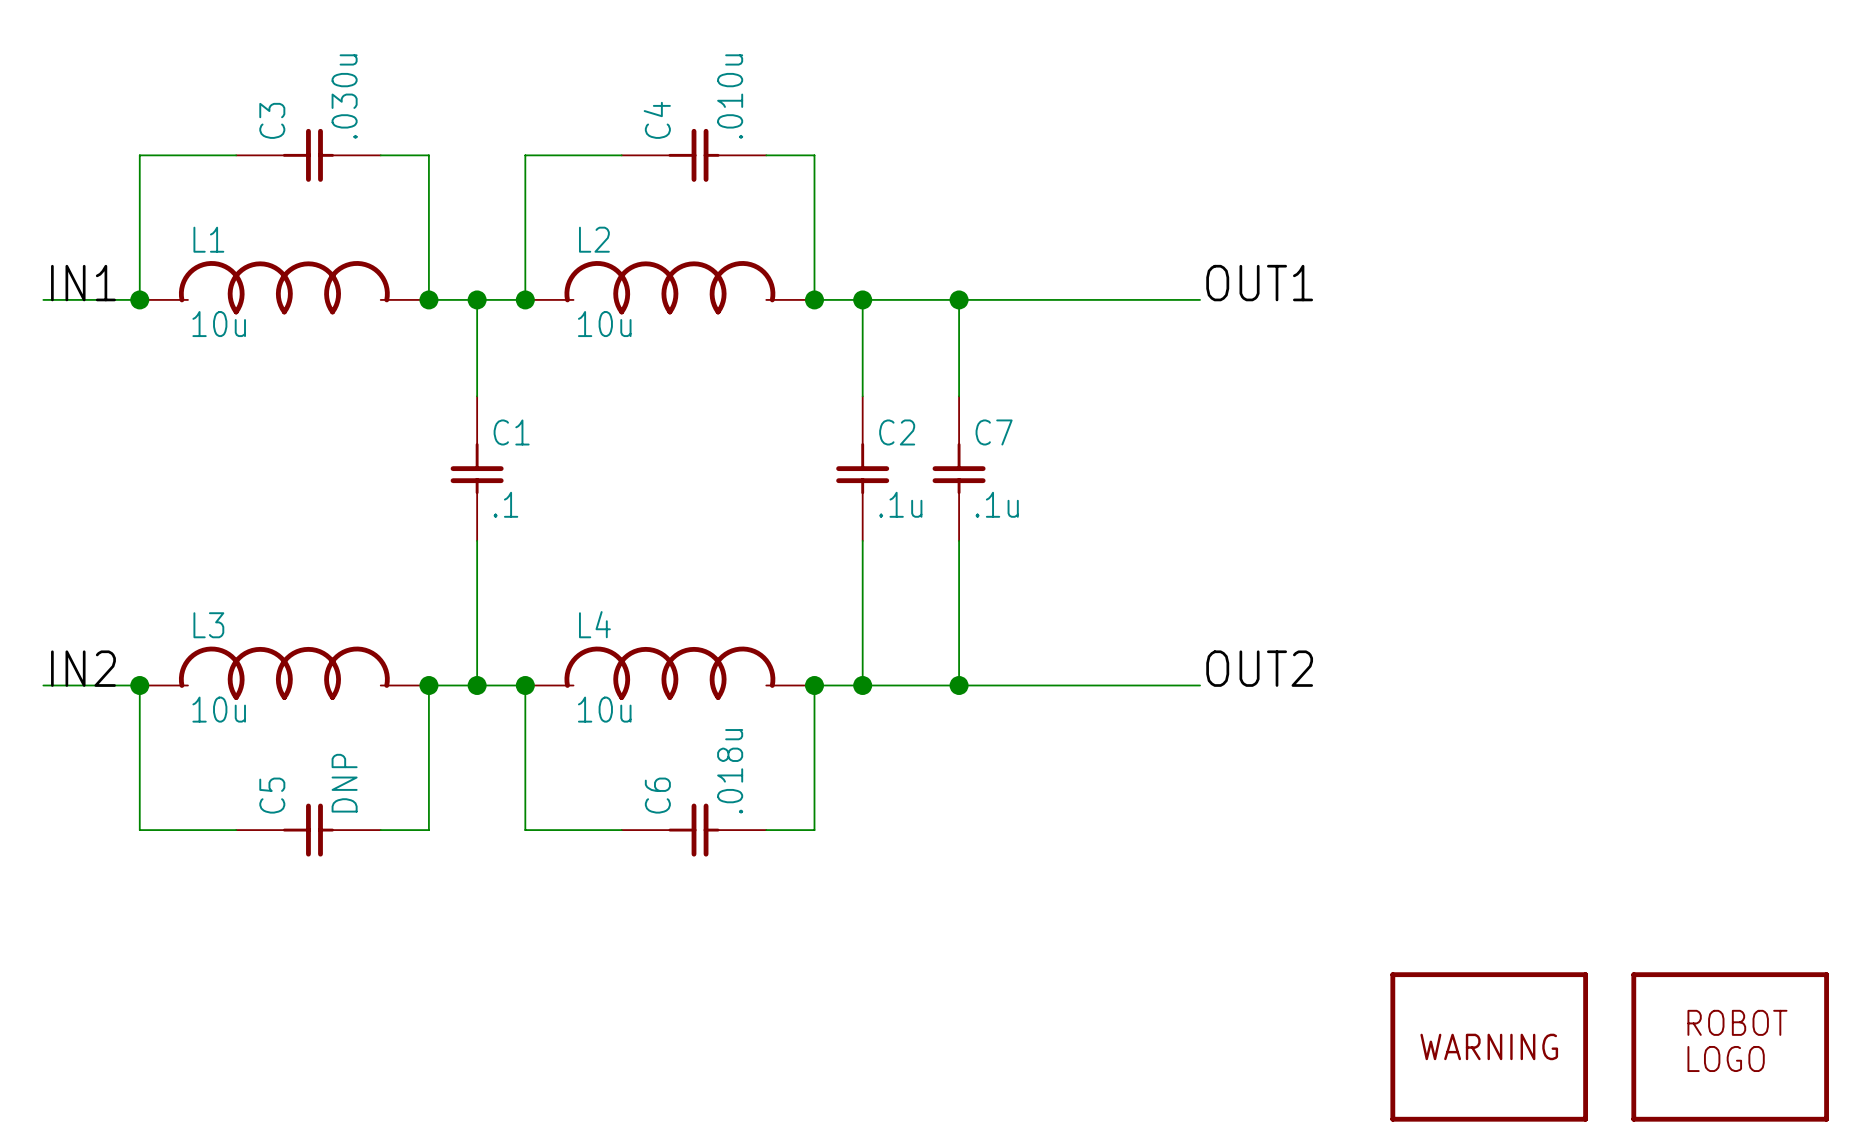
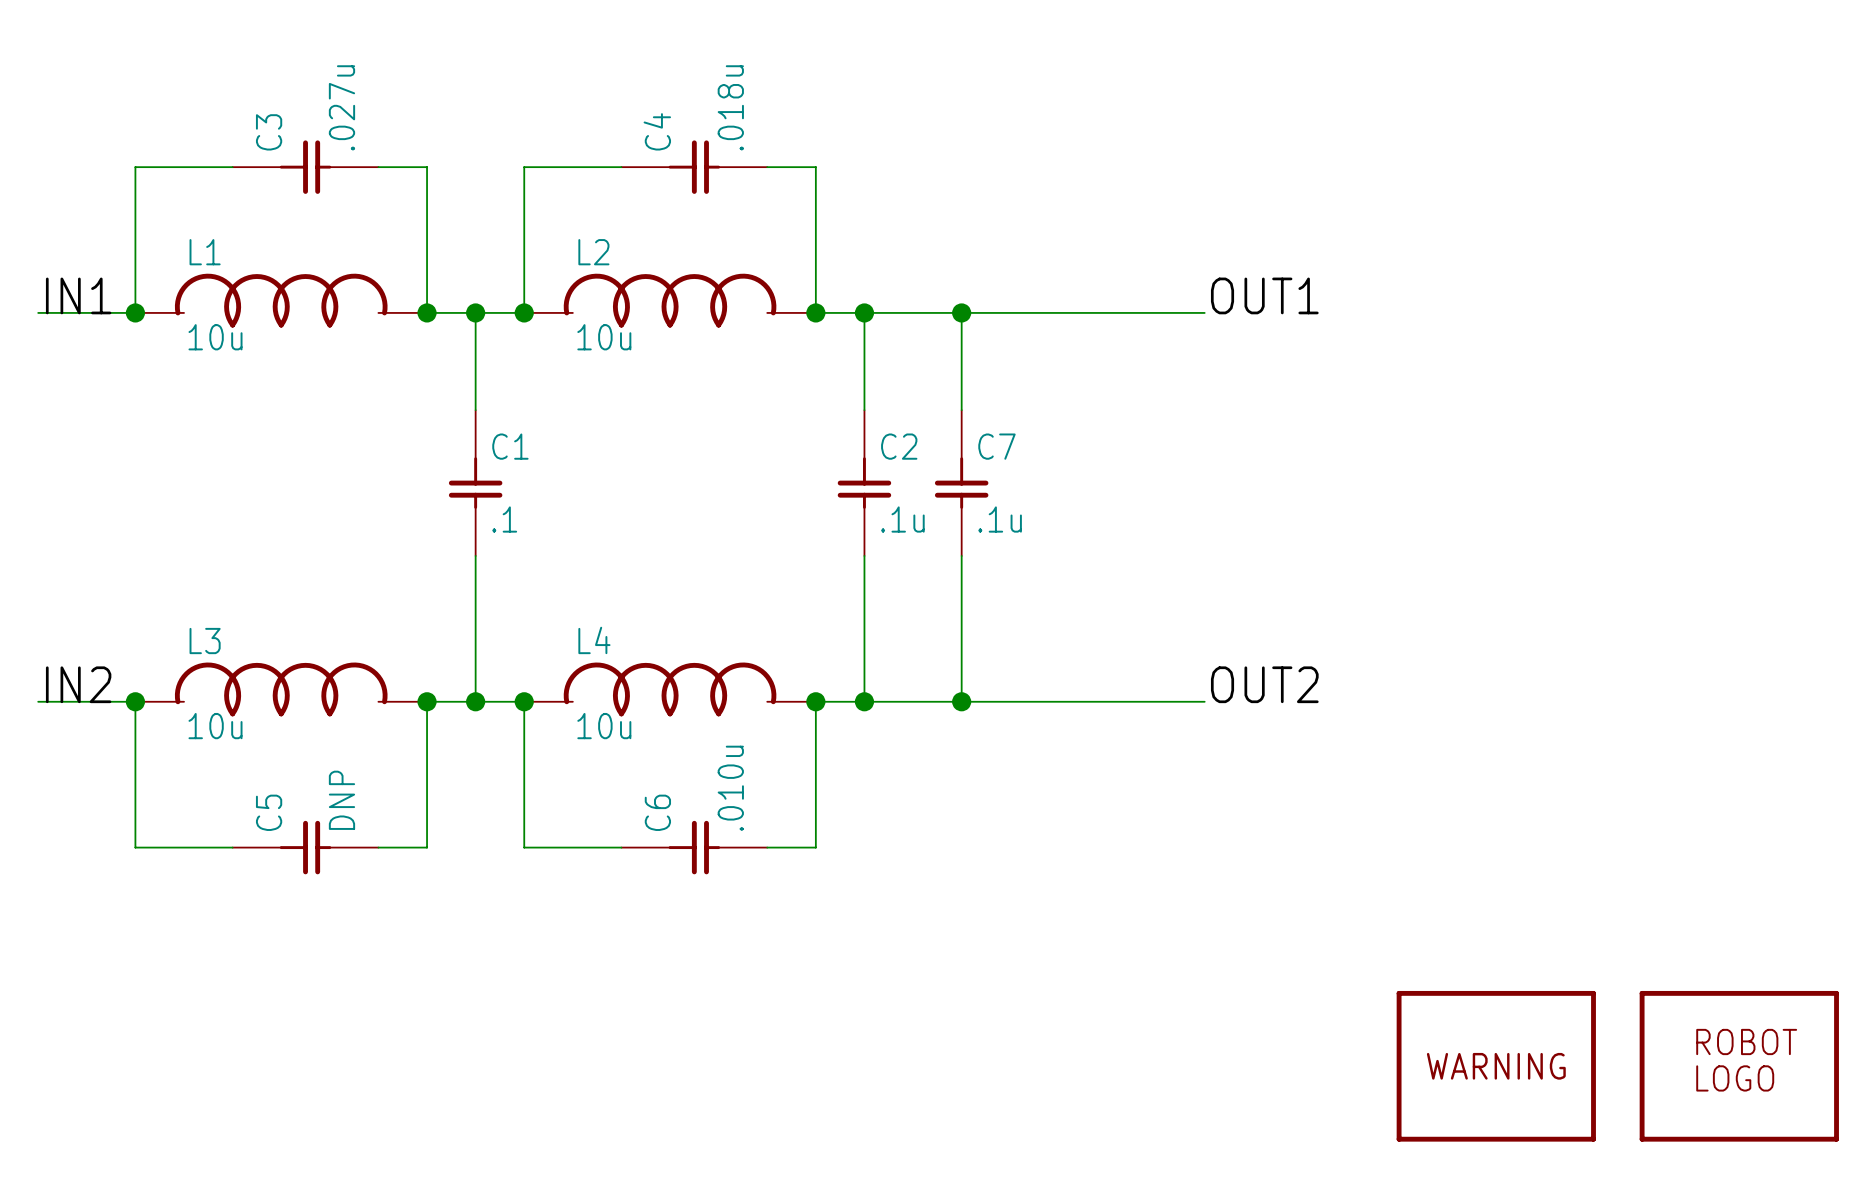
C3 value: .030u (344, 96) -> .027u (341, 107)
C4 value: .010u (730, 96) -> .018u (730, 107)
C6 value: .018u (730, 771) -> .010u (730, 788)

